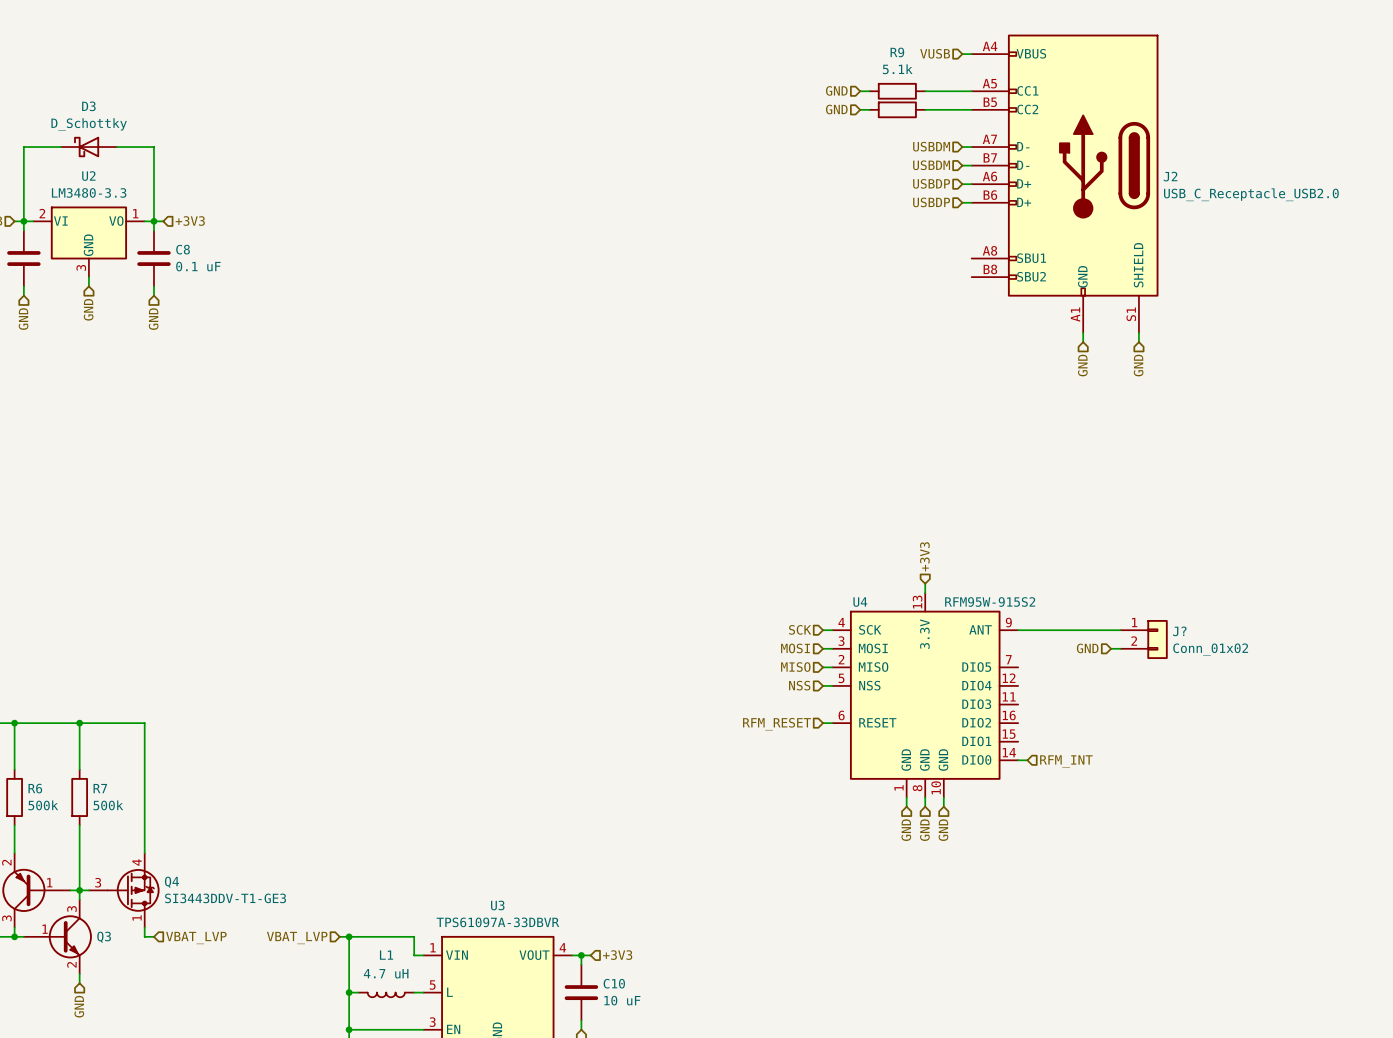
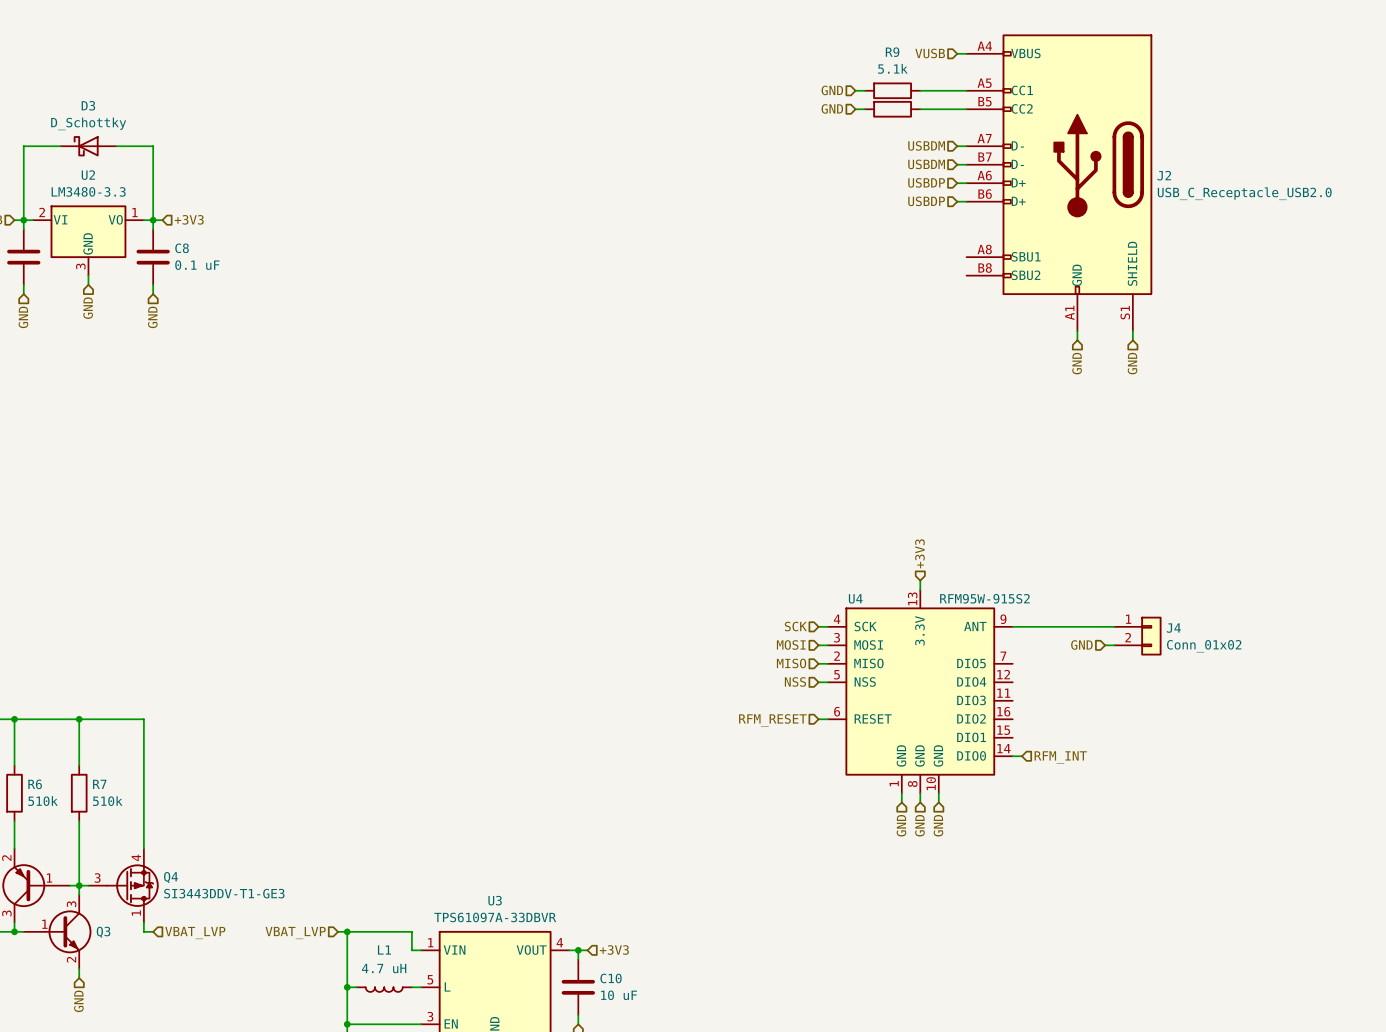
J? name: J? (1179, 631) -> J4 (1173, 628)
R6 value: 500k (43, 805) -> 510k (43, 801)
R7 value: 500k (108, 805) -> 510k (107, 801)

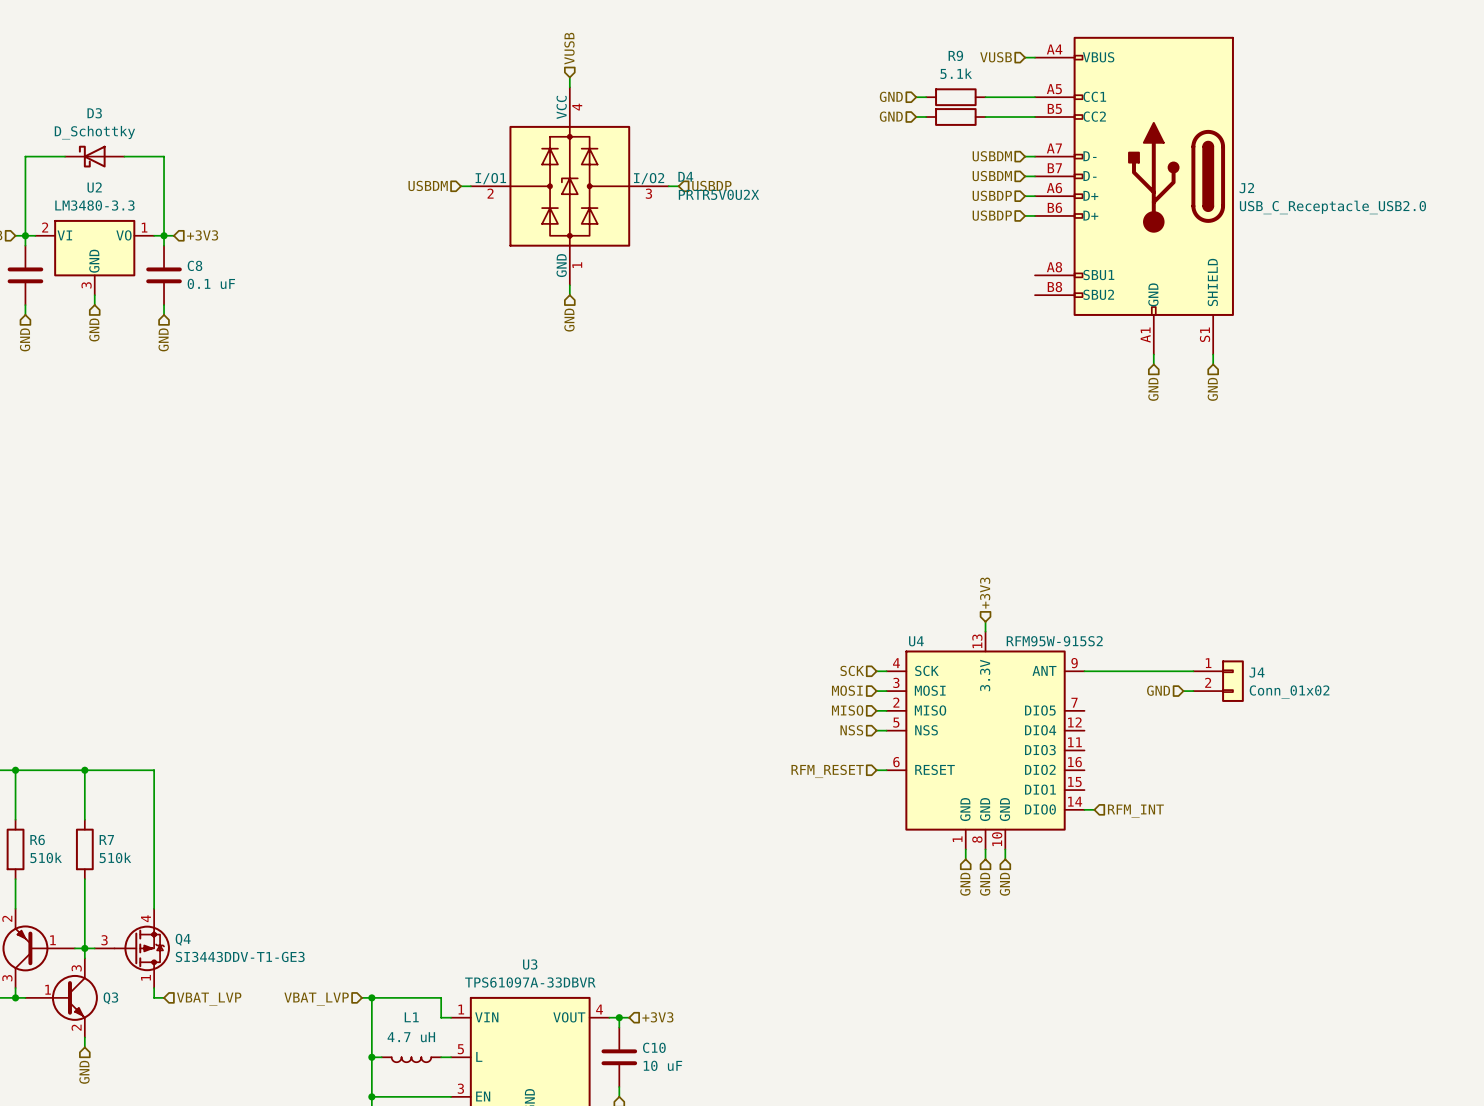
hierarchical label: none -> VUSB (569, 48)
wire: none -> (569, 77) (569, 87)
hierarchical label: none -> USBDM (428, 185)
wire: none -> (460, 186) (470, 186)
D4: none -> PRTR5V0U2X (569, 186)
wire: none -> (668, 186) (678, 186)
hierarchical label: none -> USBDP (711, 185)
wire: none -> (569, 285) (569, 295)
hierarchical label: none -> GND (569, 320)

